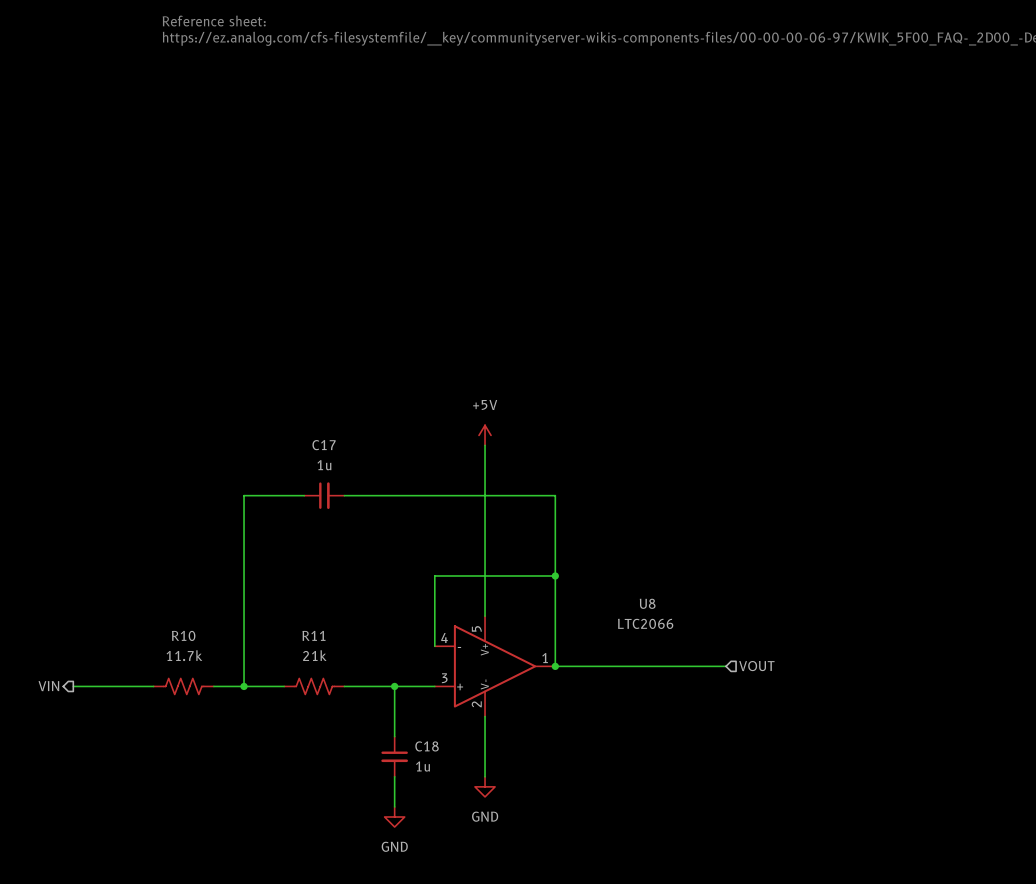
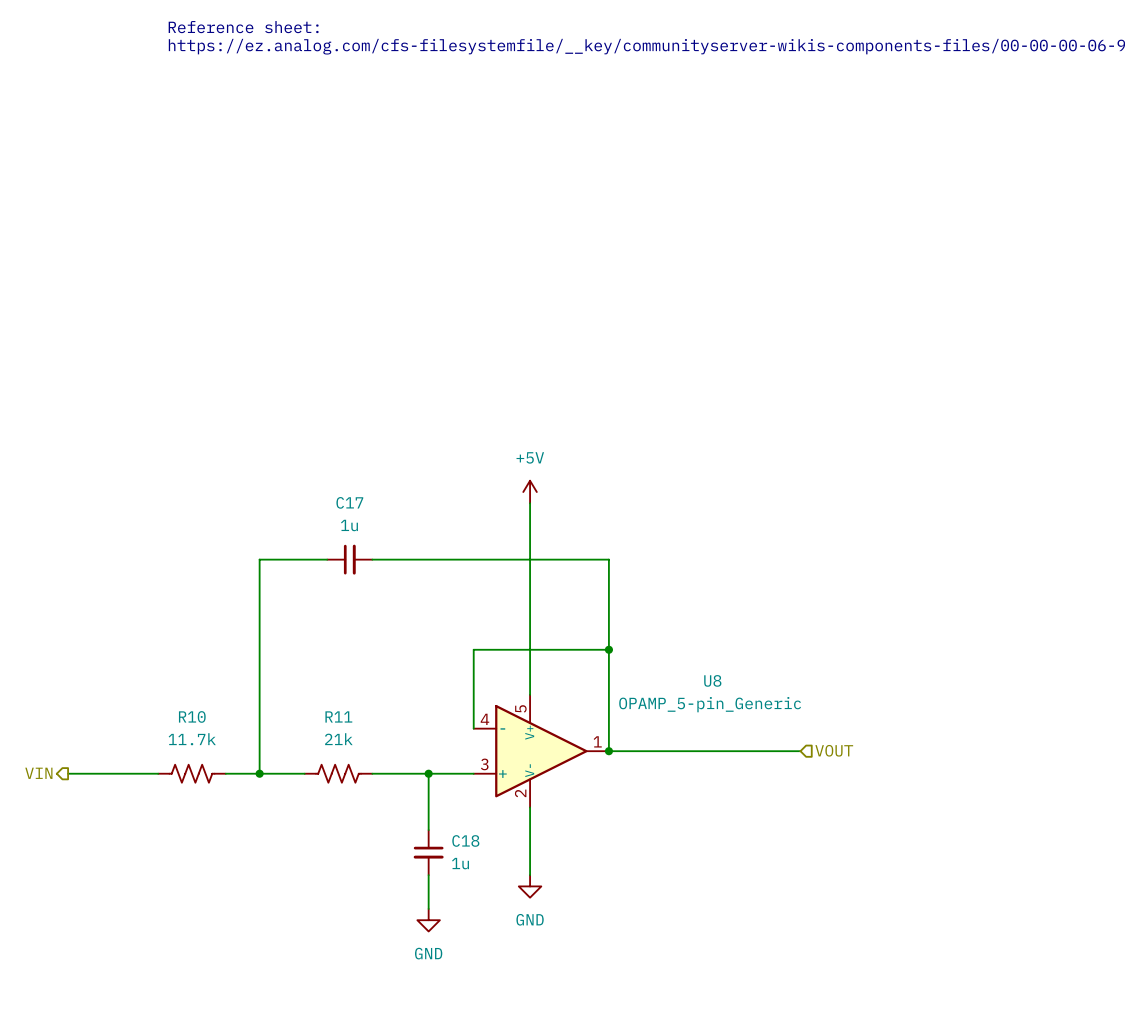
U8 value: LTC2066 (645, 623) -> OPAMP_5-pin_Generic (710, 704)

